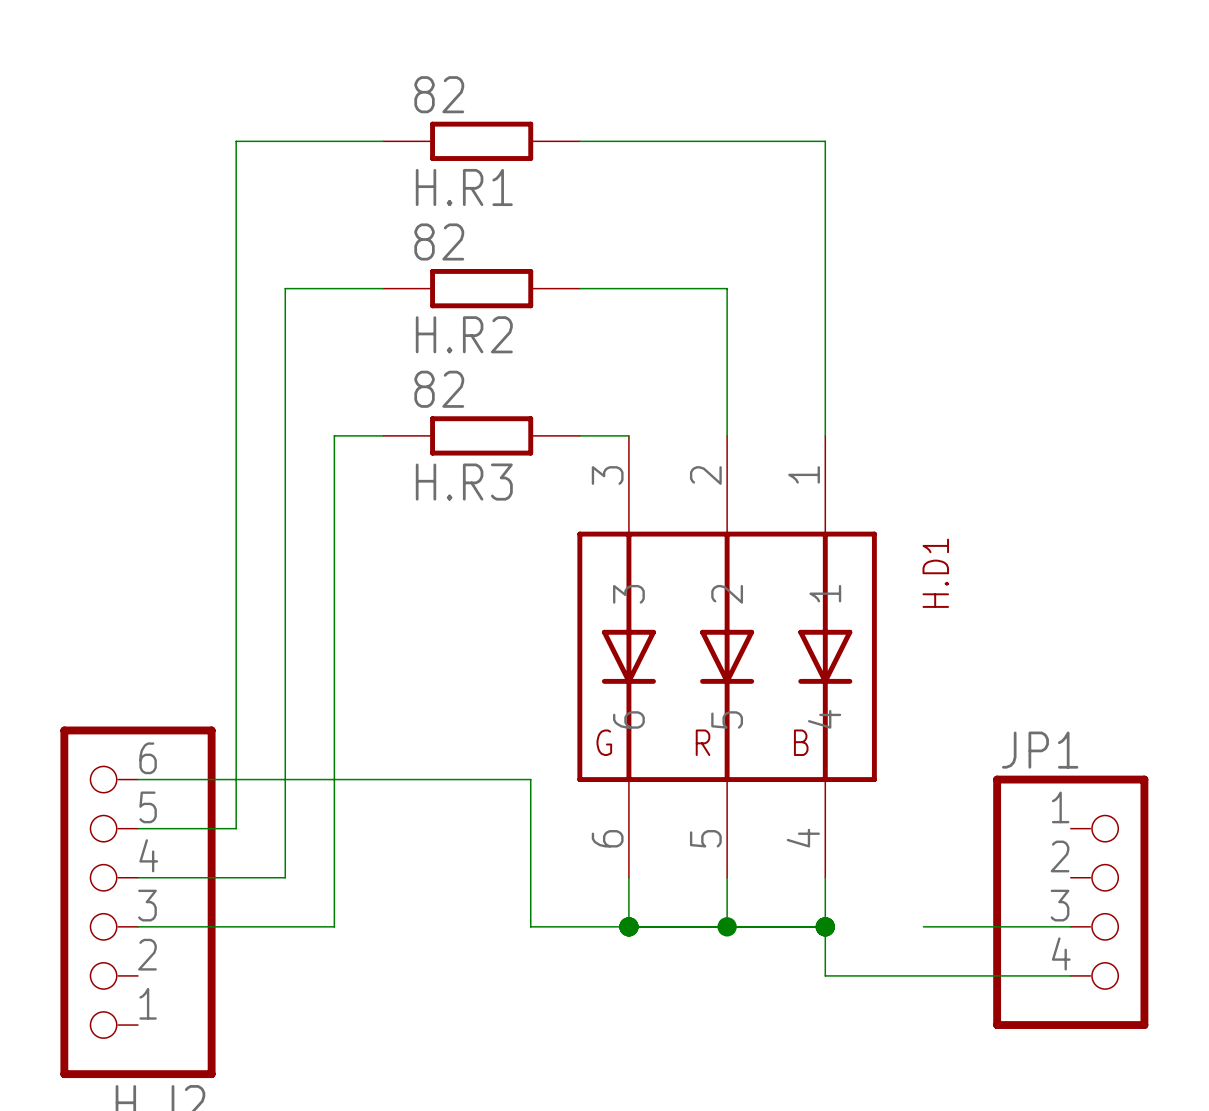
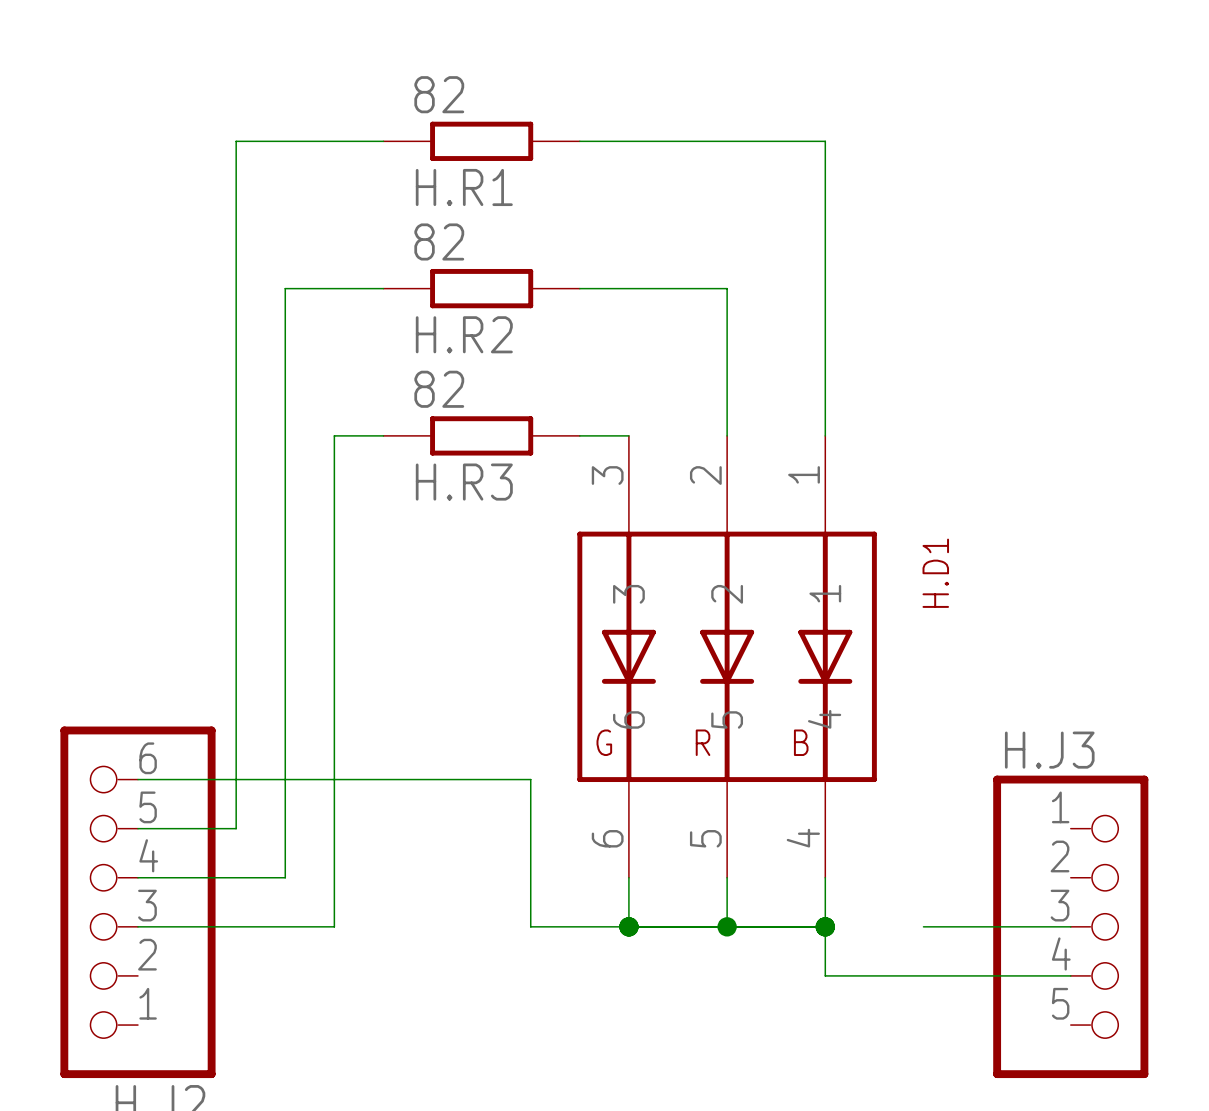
JP1: (1070, 902) -> none
H.J3: none -> (1070, 926)

